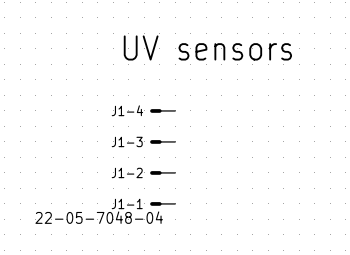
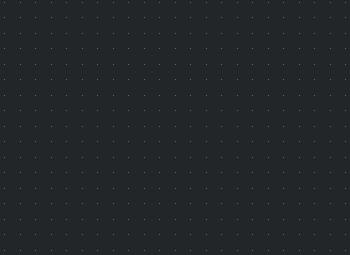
text: UV sensors (207, 47) -> none
J1-4: (162, 110) -> none
J1-3: (162, 141) -> none
J1-2: (162, 172) -> none
J1-1: 22-05-7048-04 (162, 203) -> none

